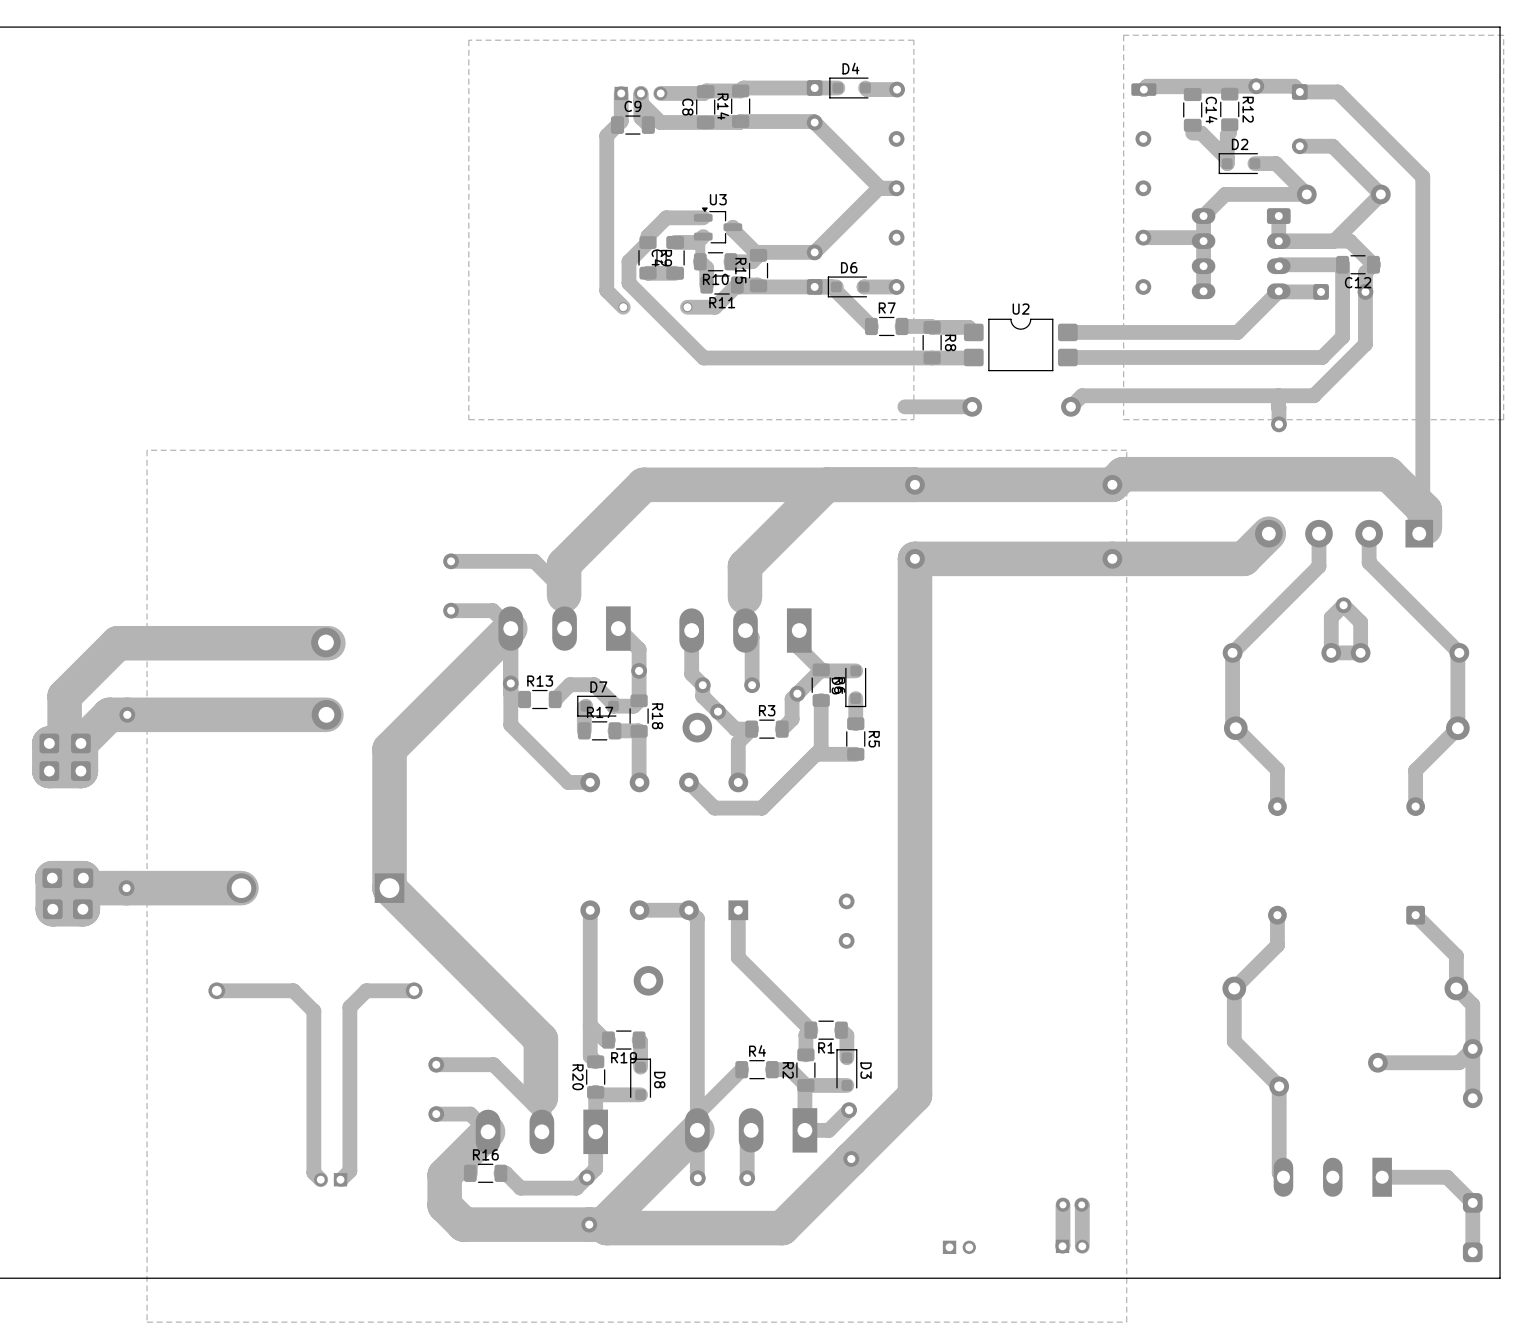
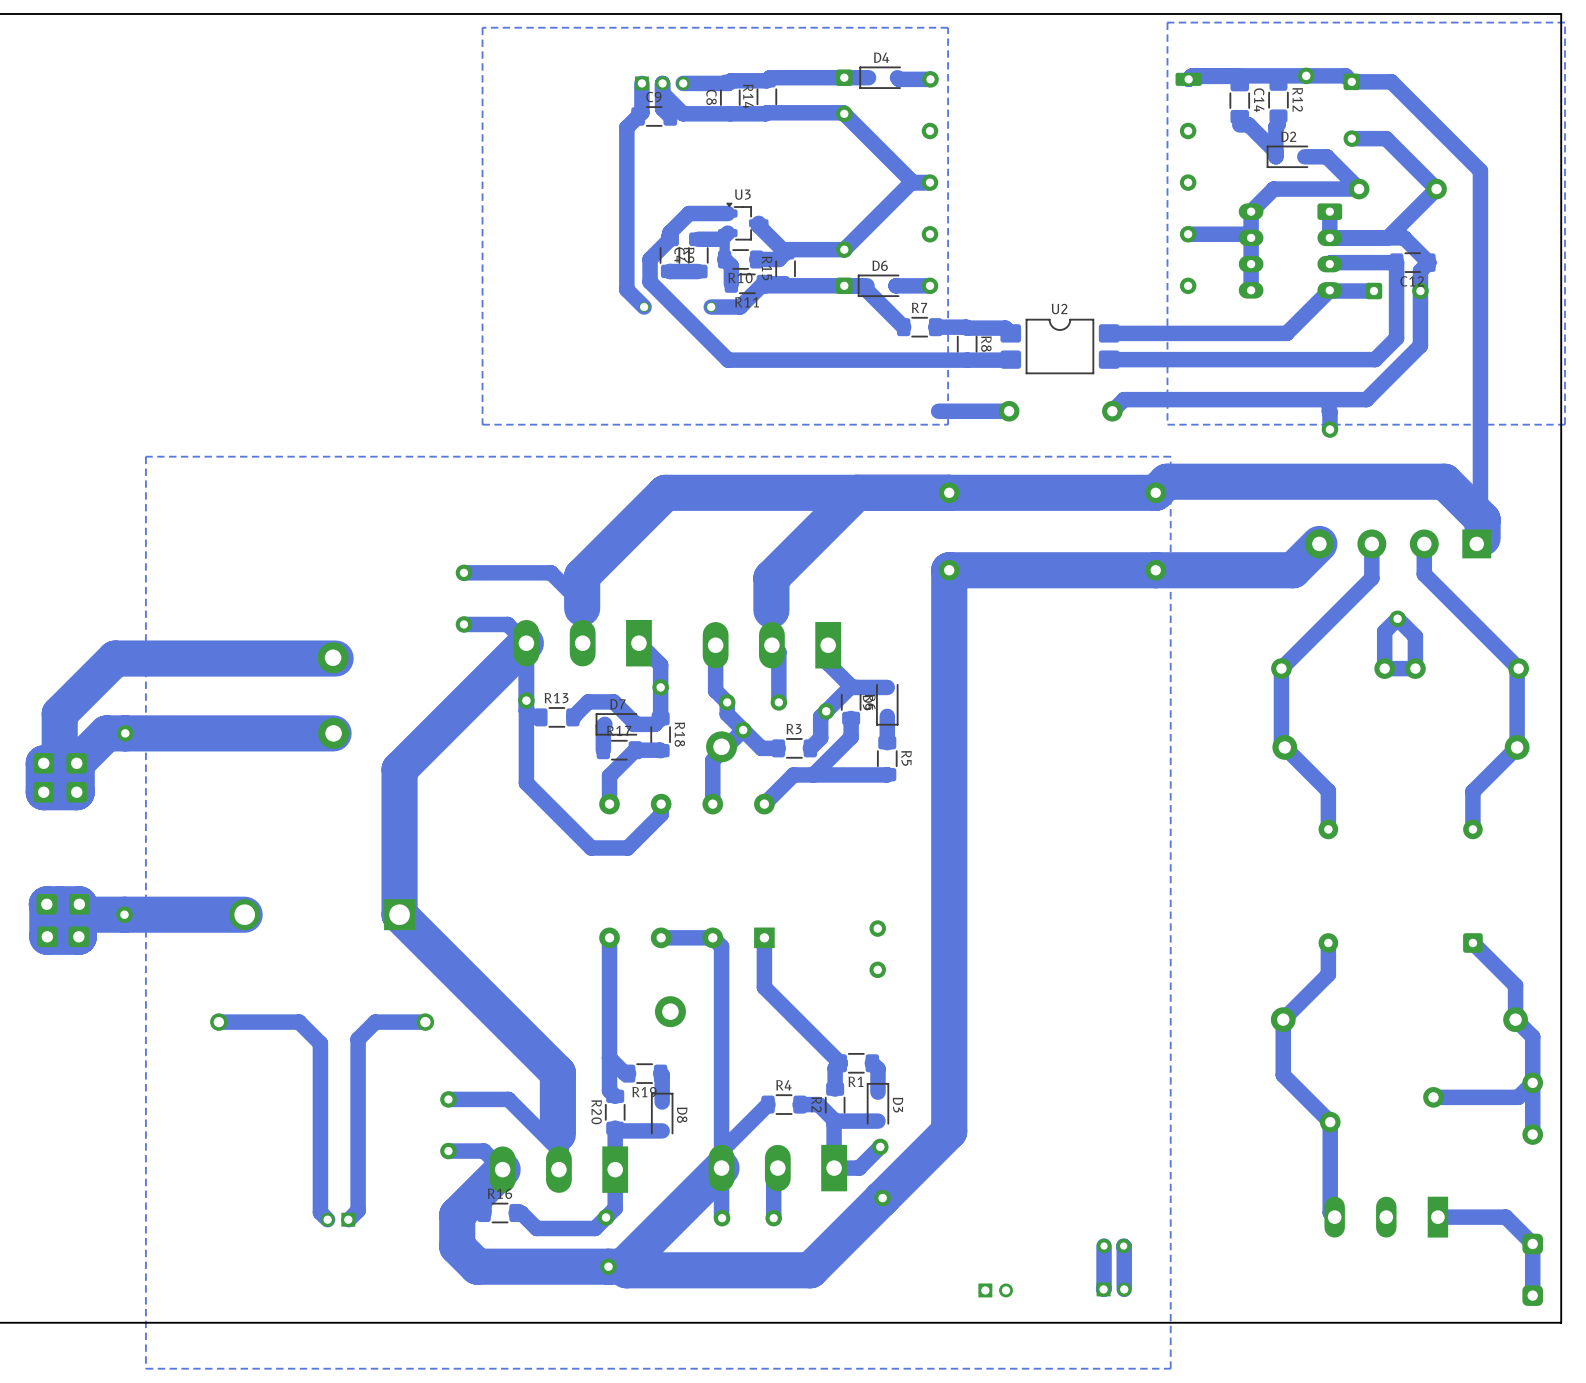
track: none -> (743, 730) (712, 760) (712, 804)
track: (821, 718) (821, 748) (761, 808) (714, 808) (688, 782) -> (851, 737) (813, 774)
track: (510, 725) (568, 782) (590, 782) -> (526, 744) (526, 783) (591, 848) (627, 848) (661, 814) (661, 804)
track: (751, 729) (738, 742) (738, 782) -> none
track: none -> (635, 750) (609, 775) (609, 804)
track: (639, 731) (639, 782) -> none
track: (855, 754) (815, 754) -> (887, 774) (793, 774) (764, 804)

